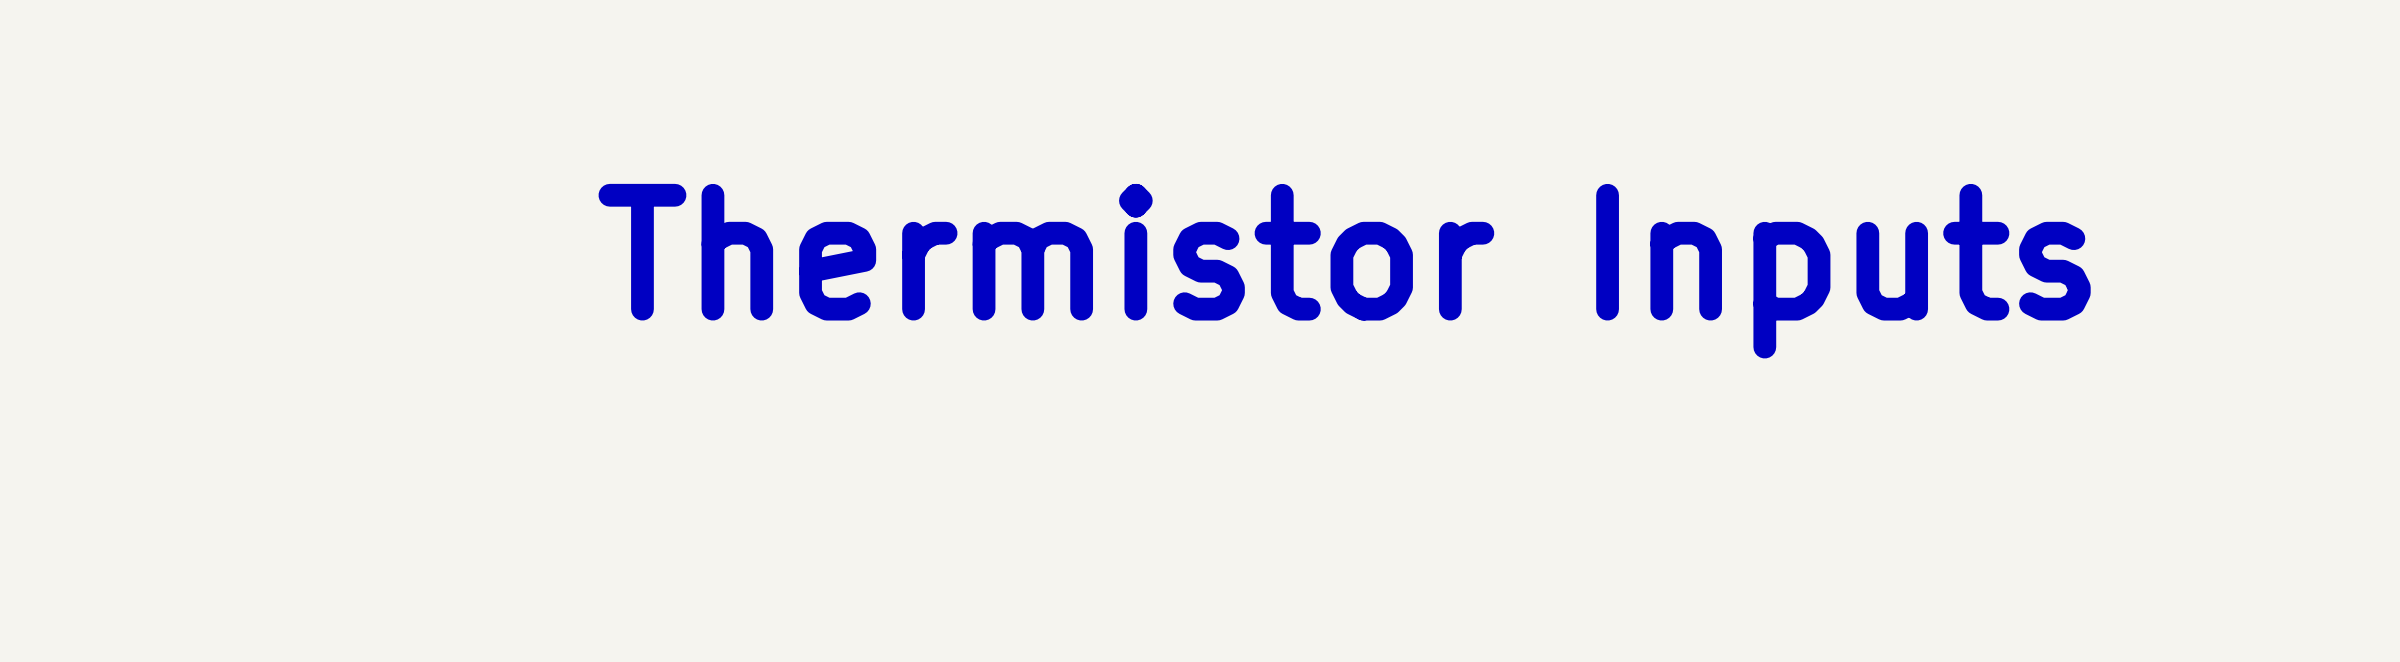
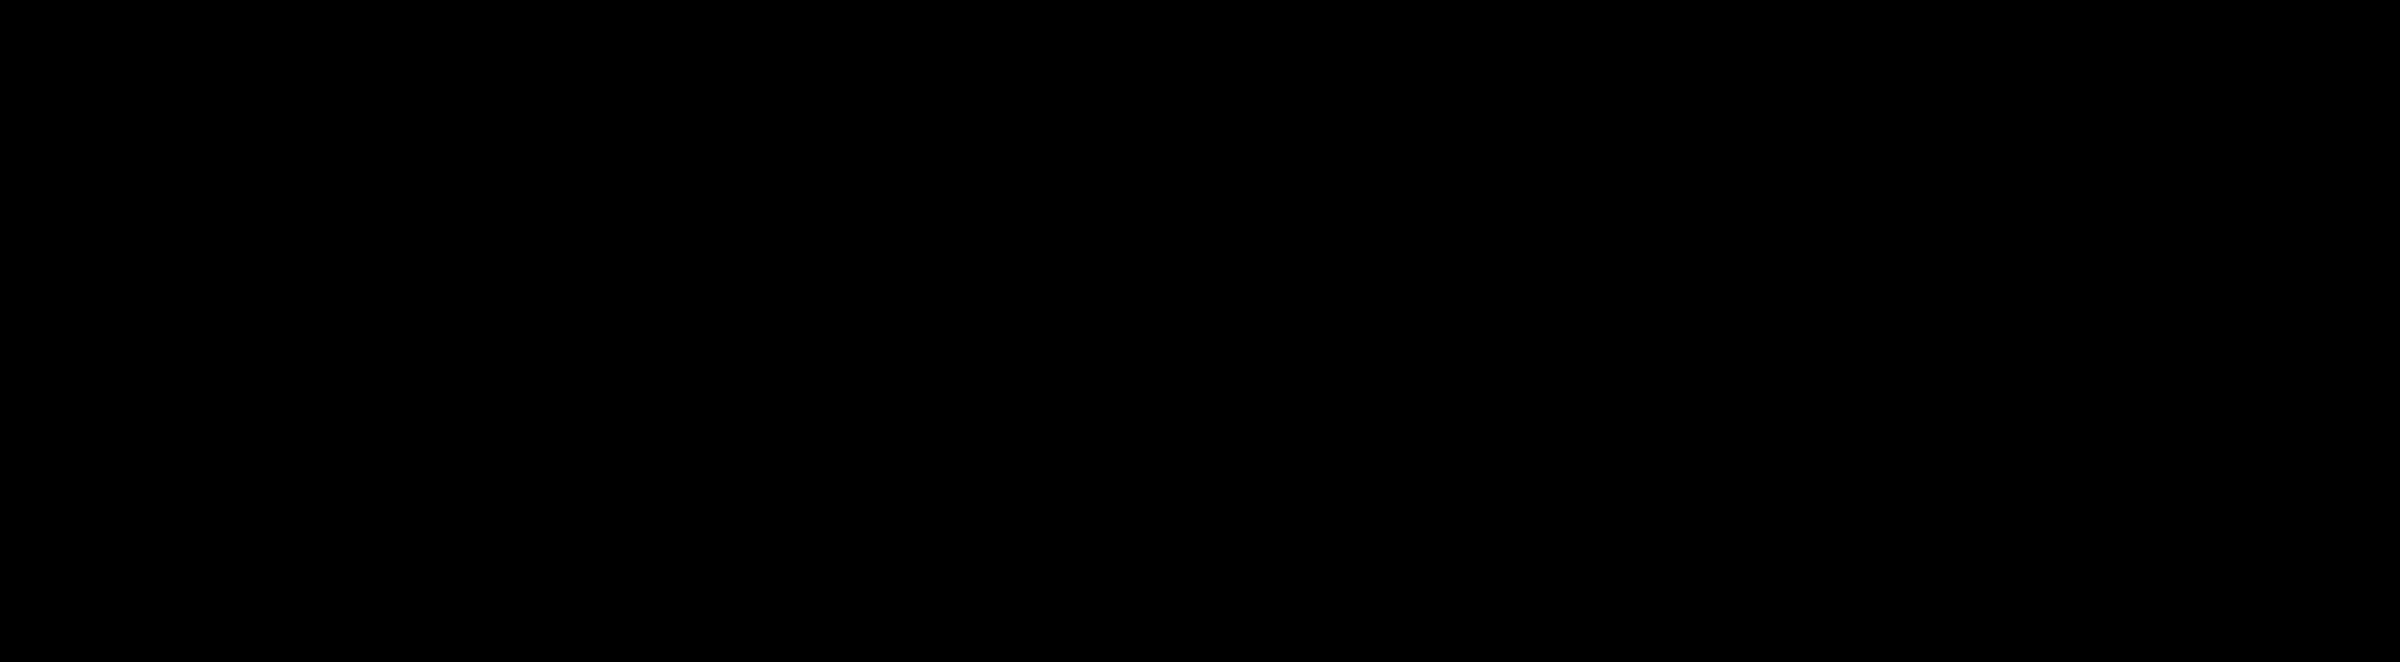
text: Thermistor Inputs (1344, 271) -> none

